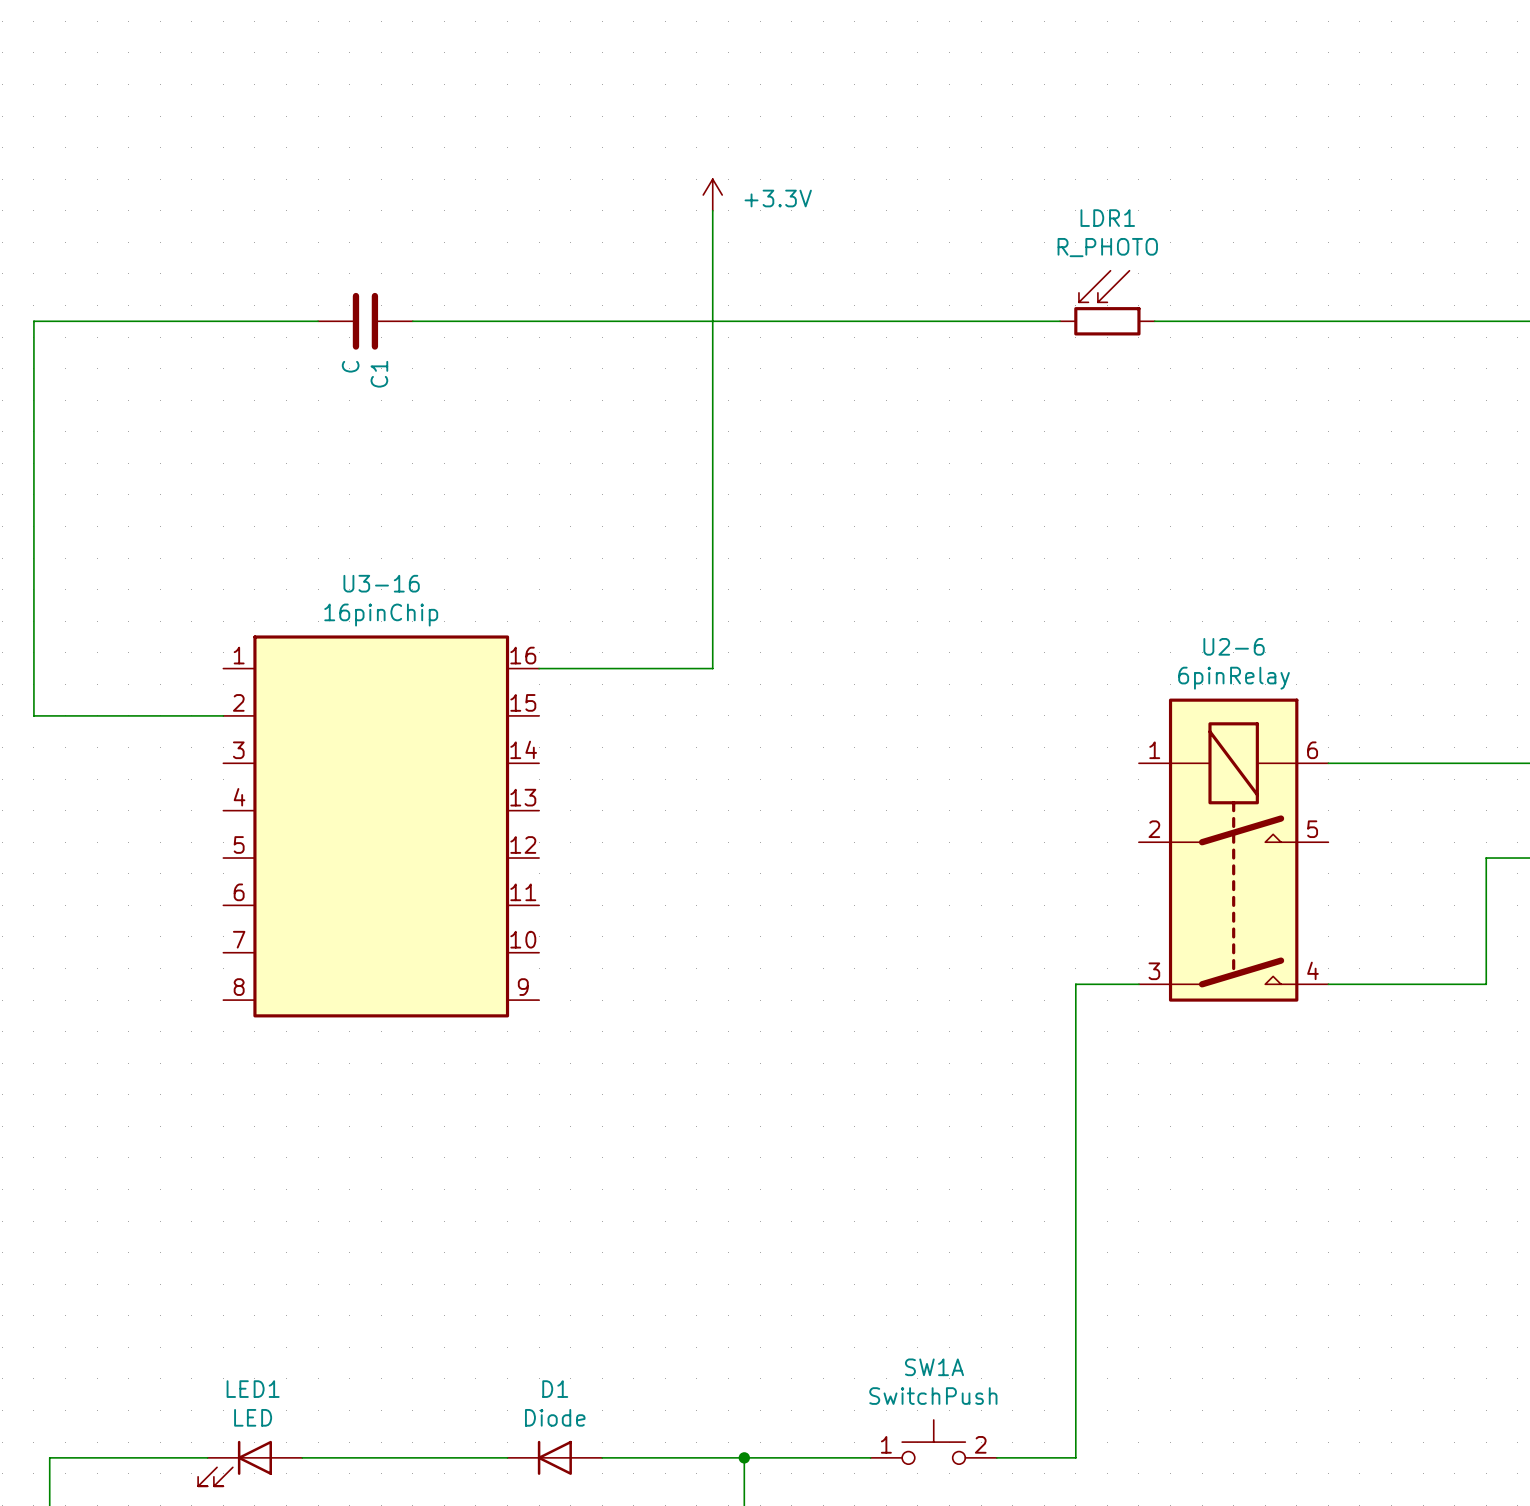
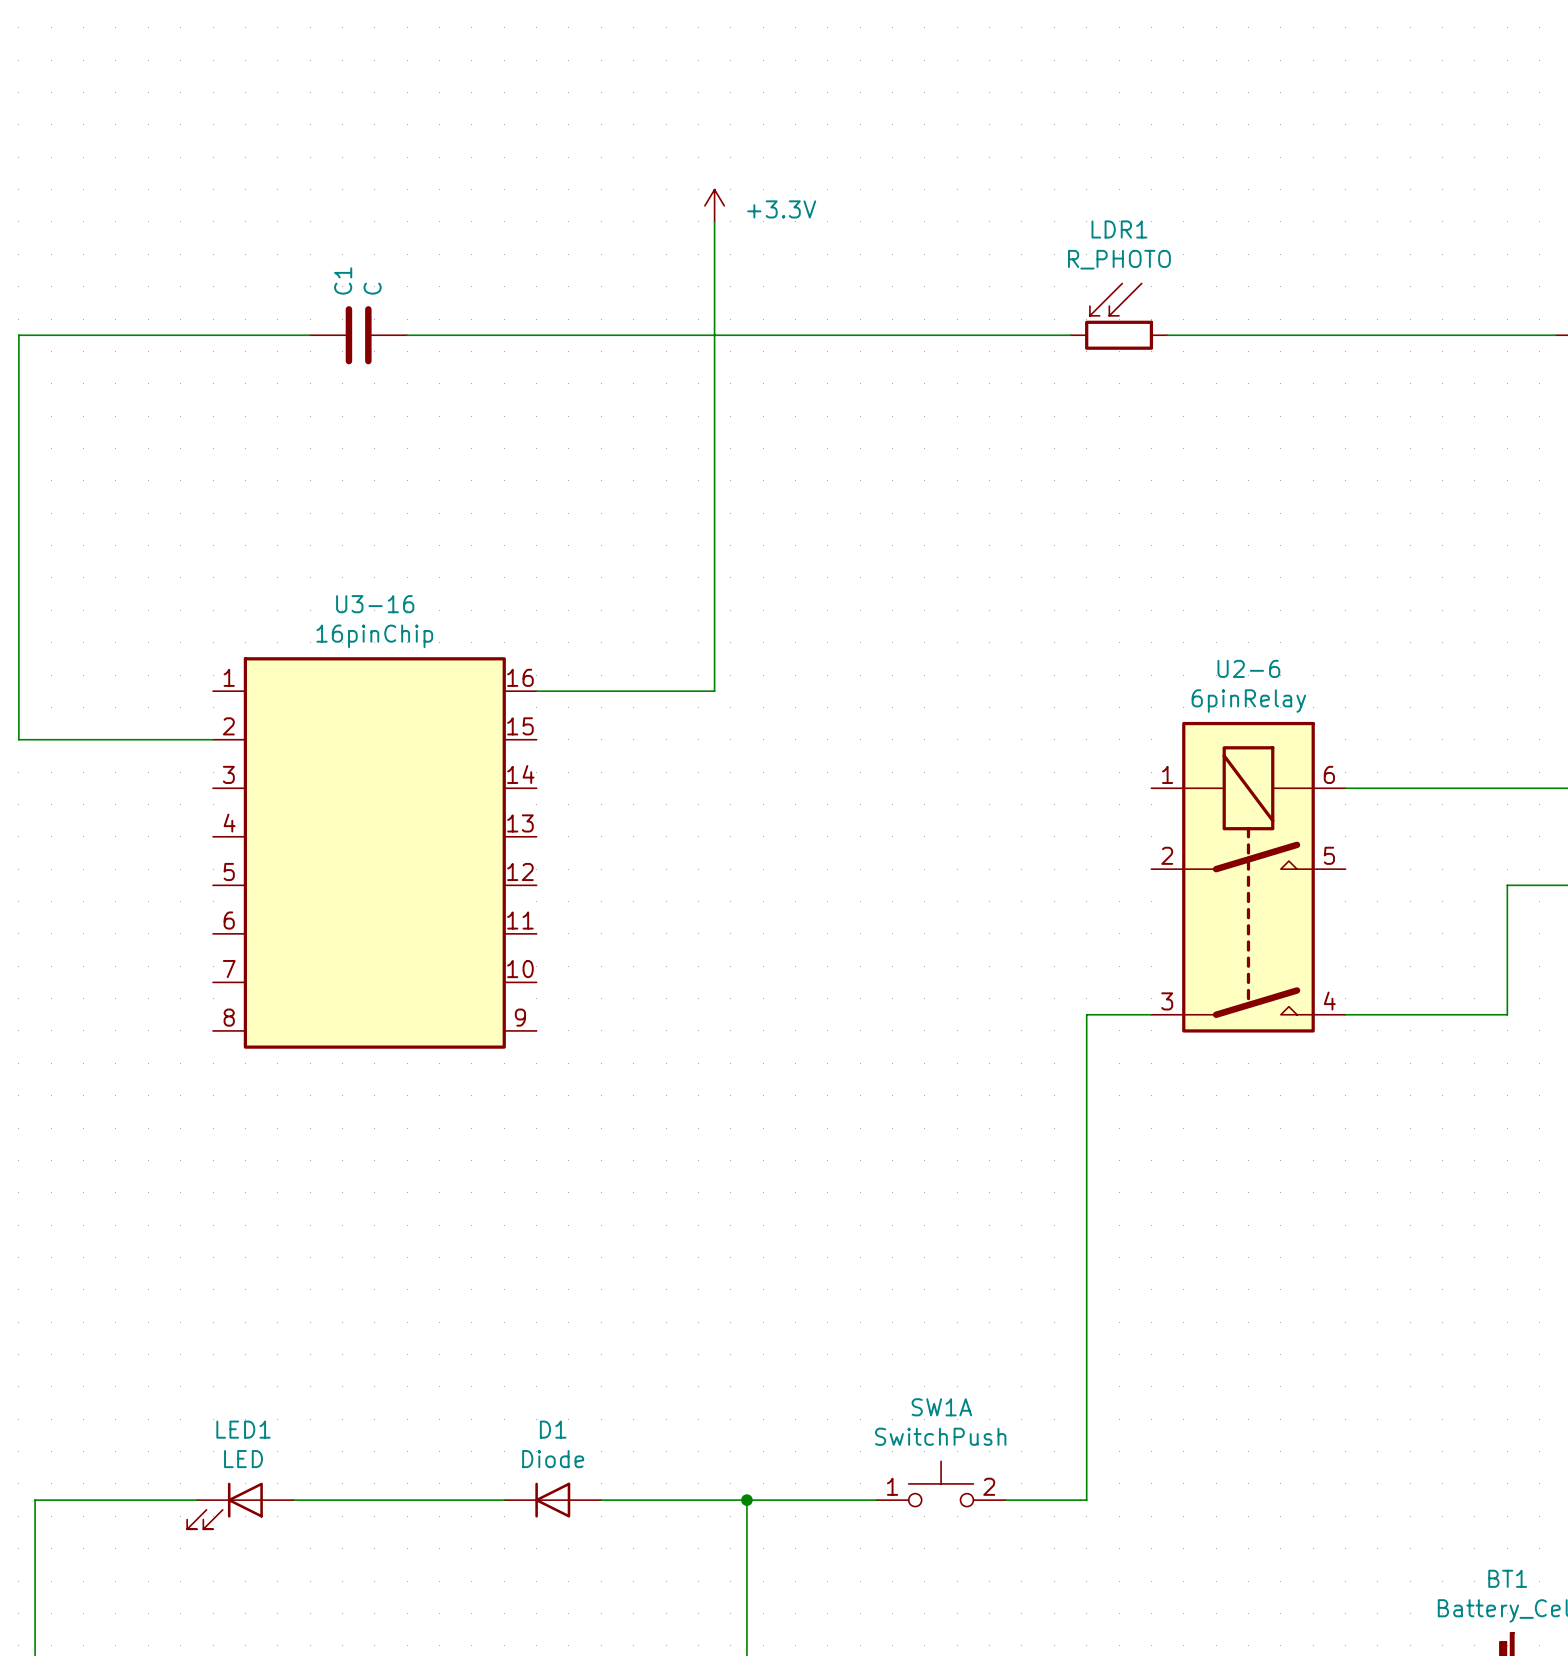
C1 value position: C (350, 366) -> C (372, 288)
C1 name position: C1 (379, 374) -> C1 (343, 280)

